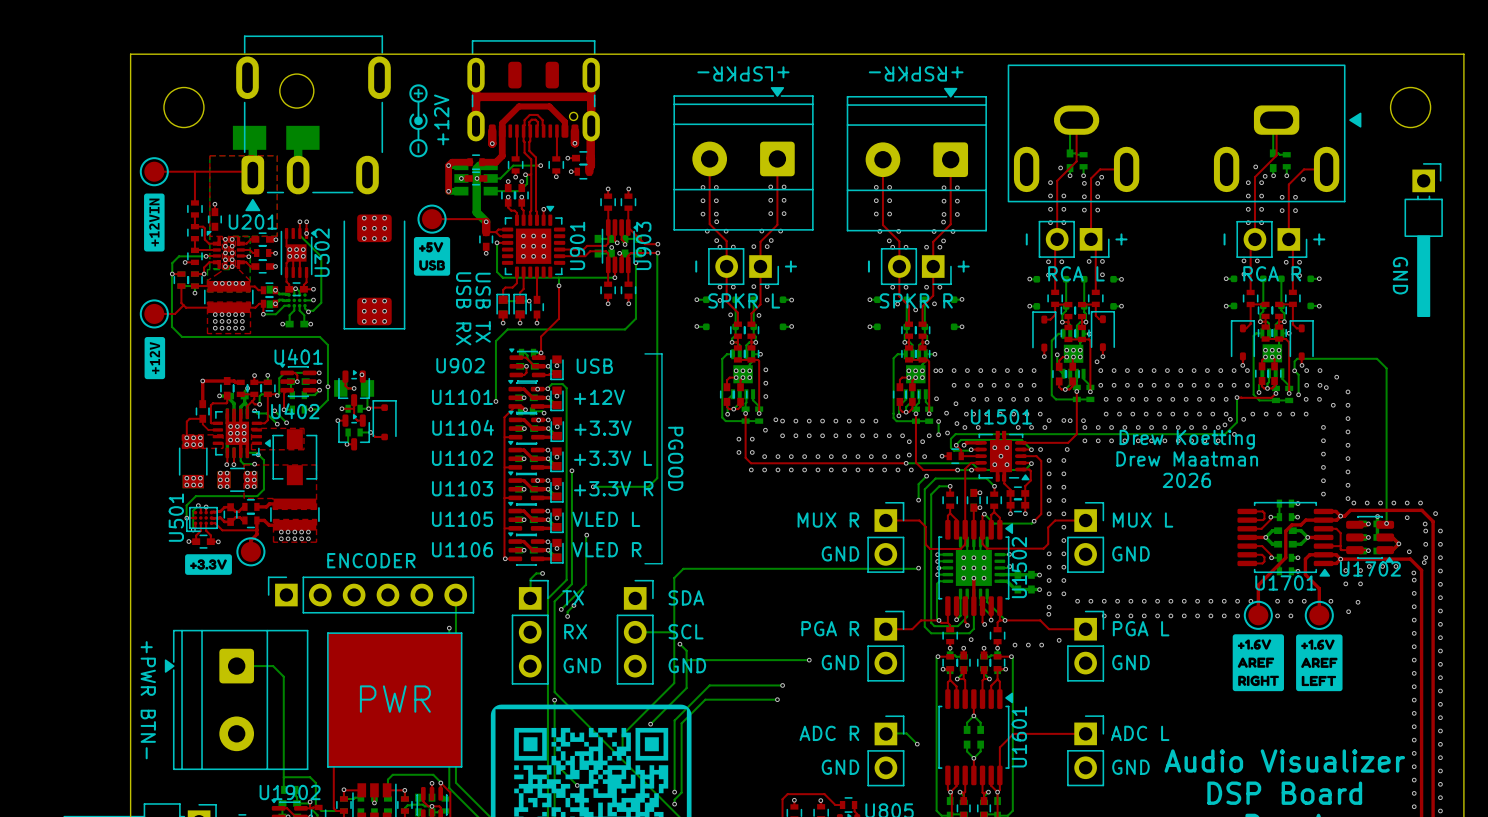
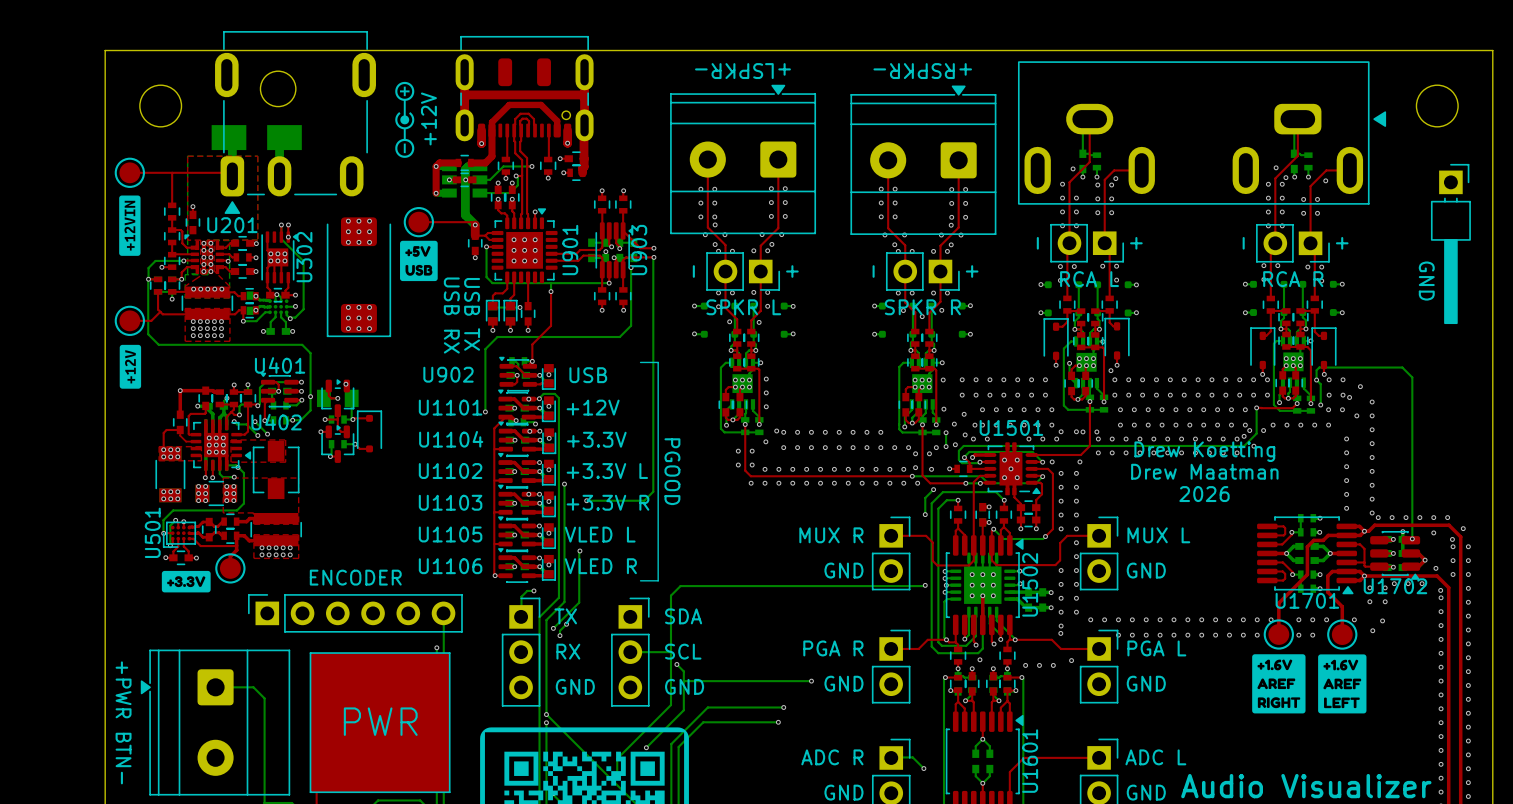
via: (940, 370) -> none
via: (1424, 562) -> none
via: none -> (546, 714)

